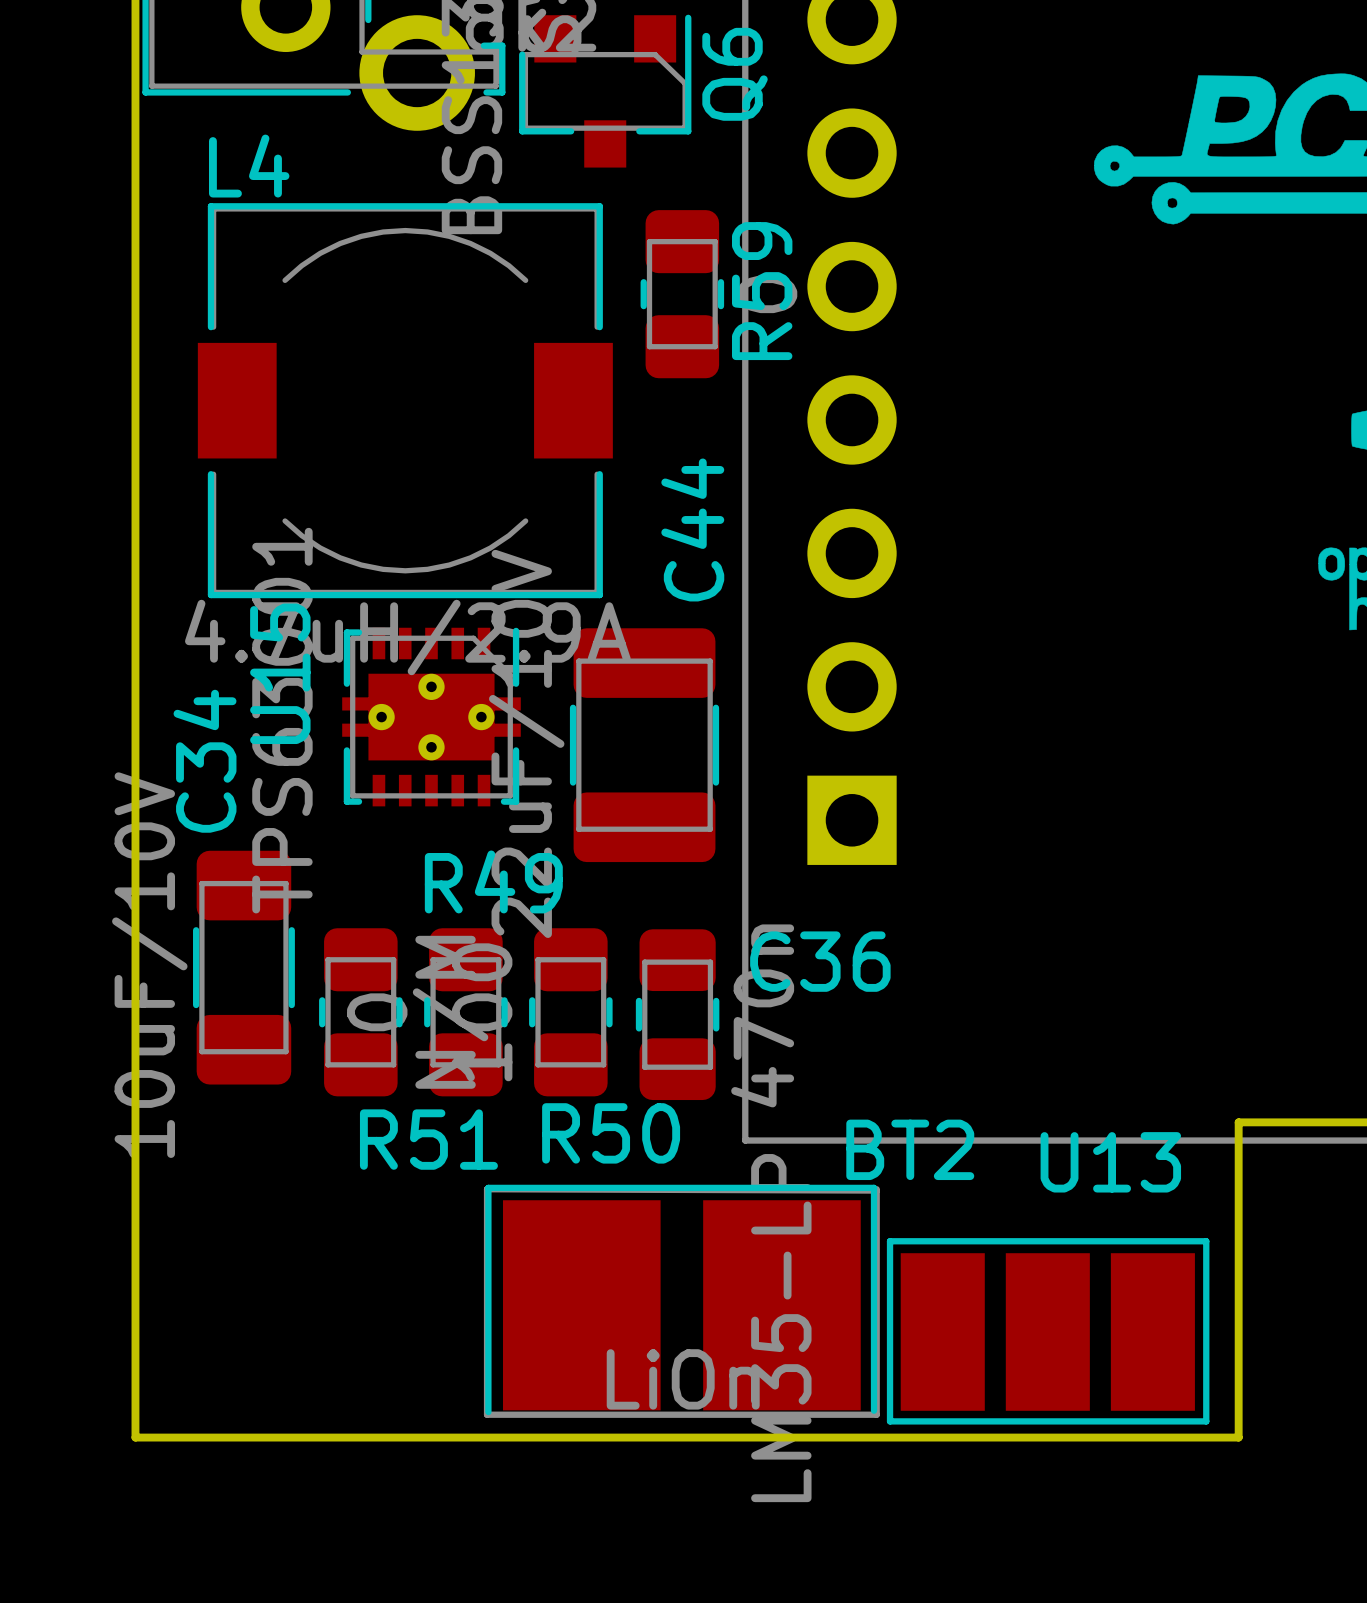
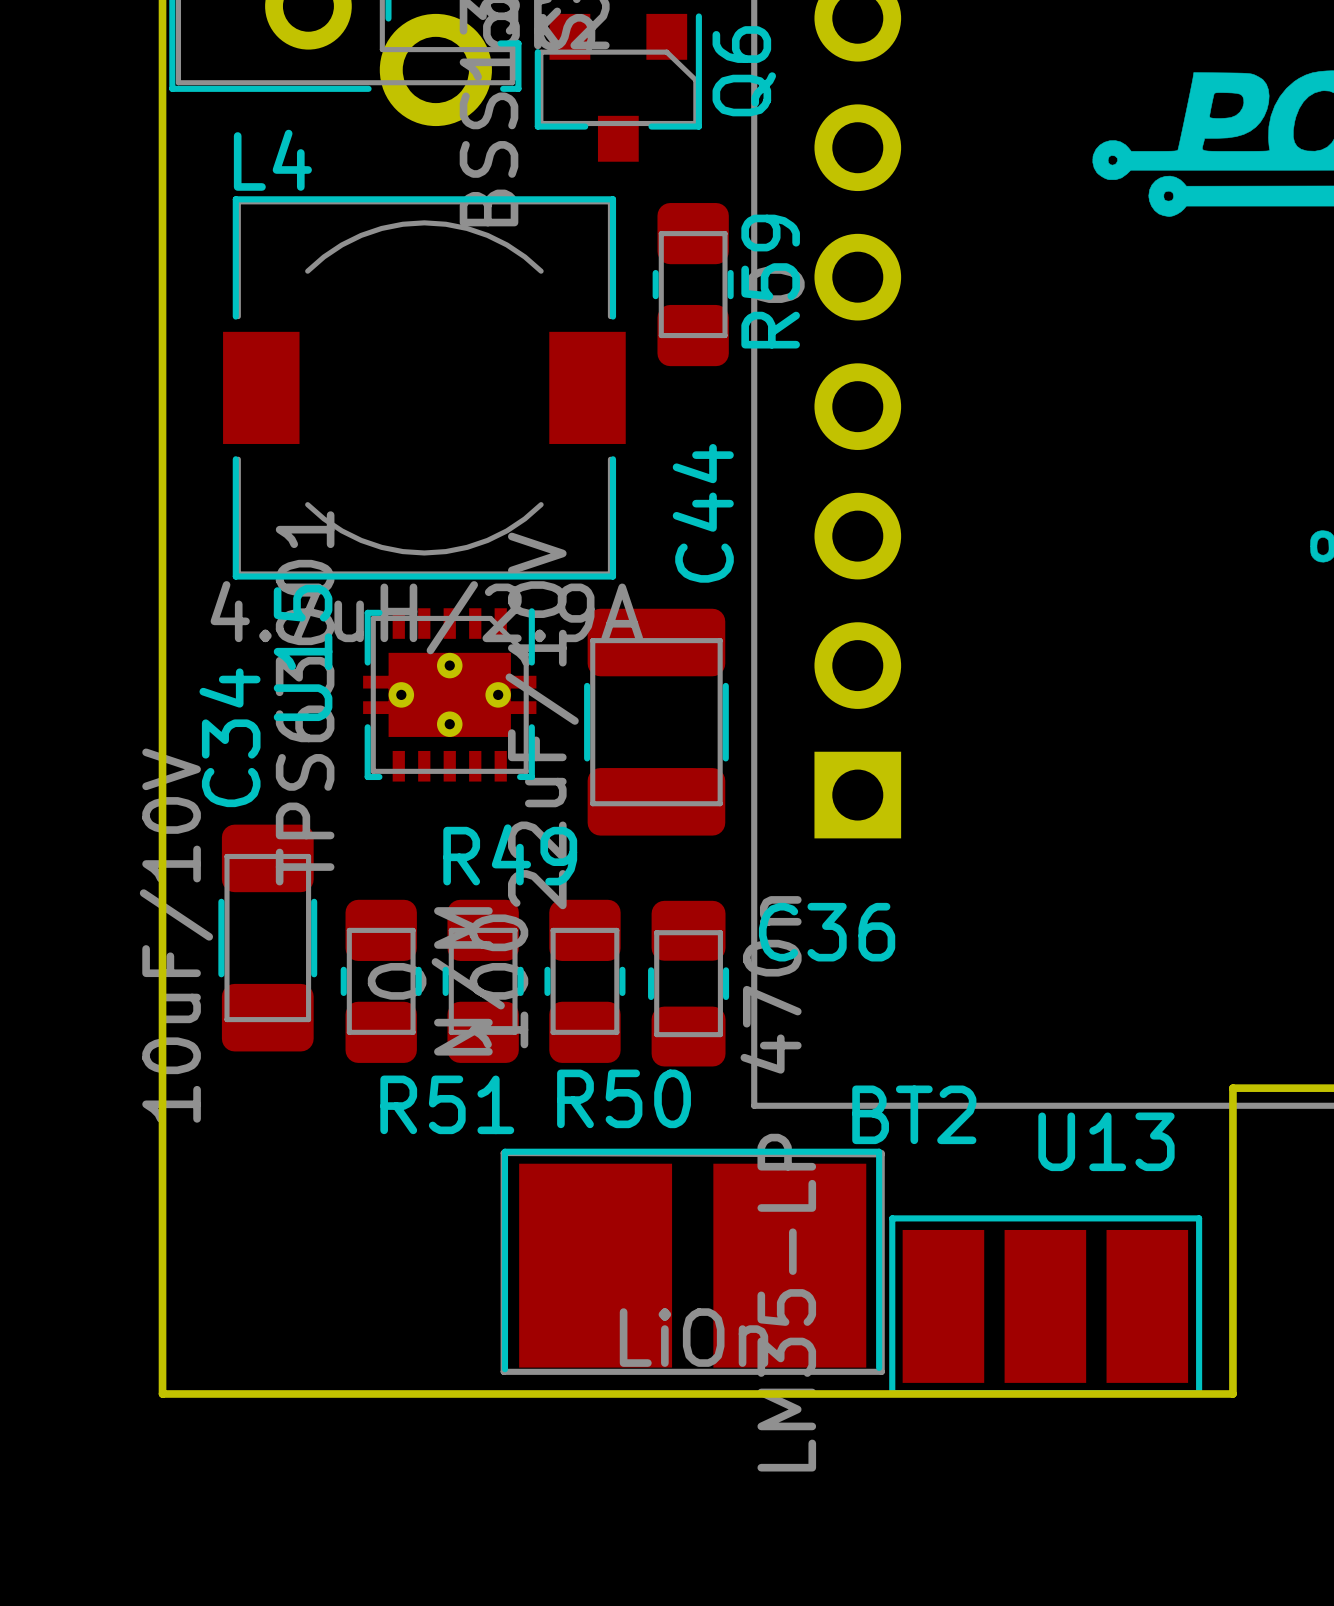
U13 position: (1048, 1331) -> (1045, 1305)

